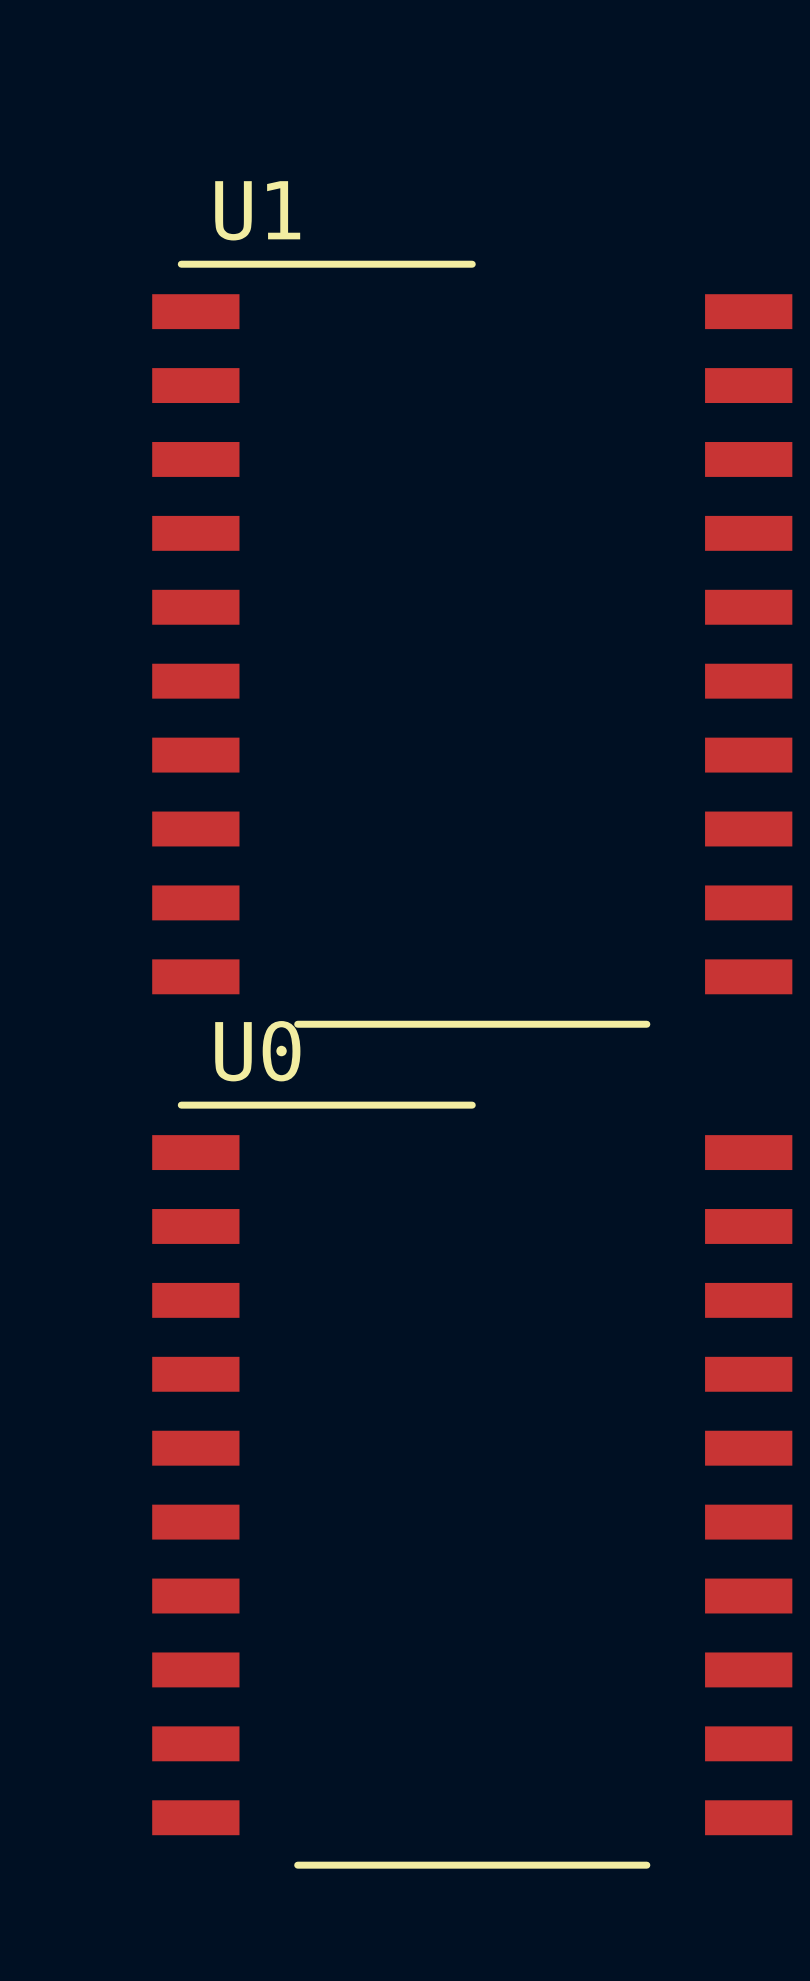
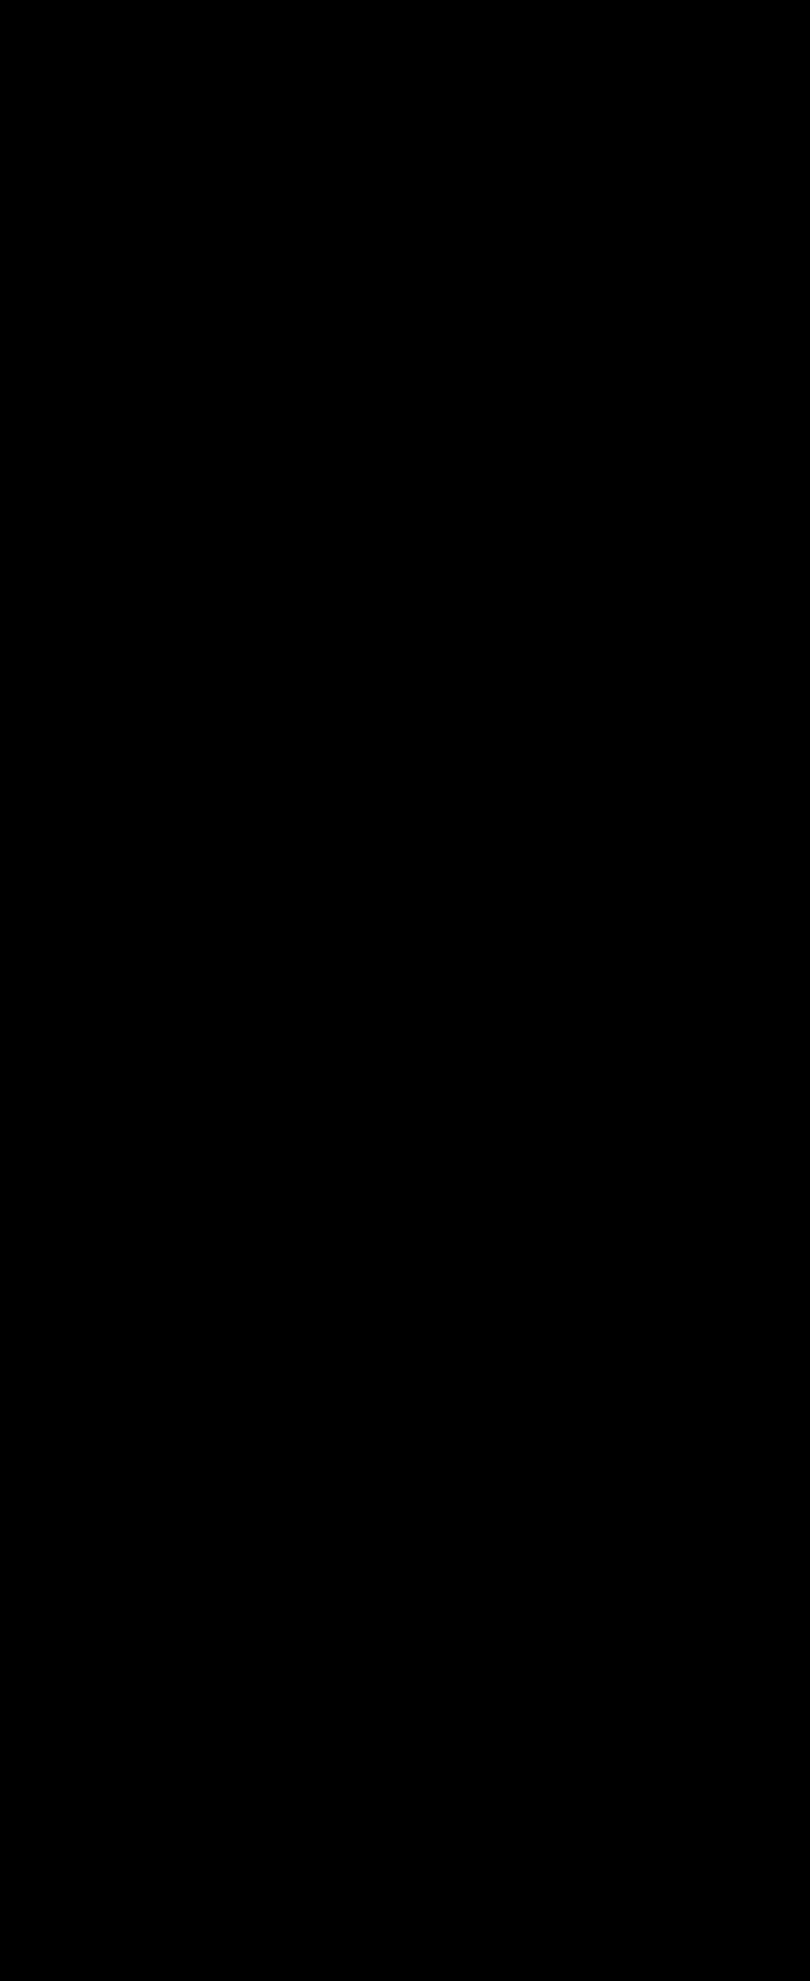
U1: (472, 644) -> none
U0: (472, 1485) -> none

